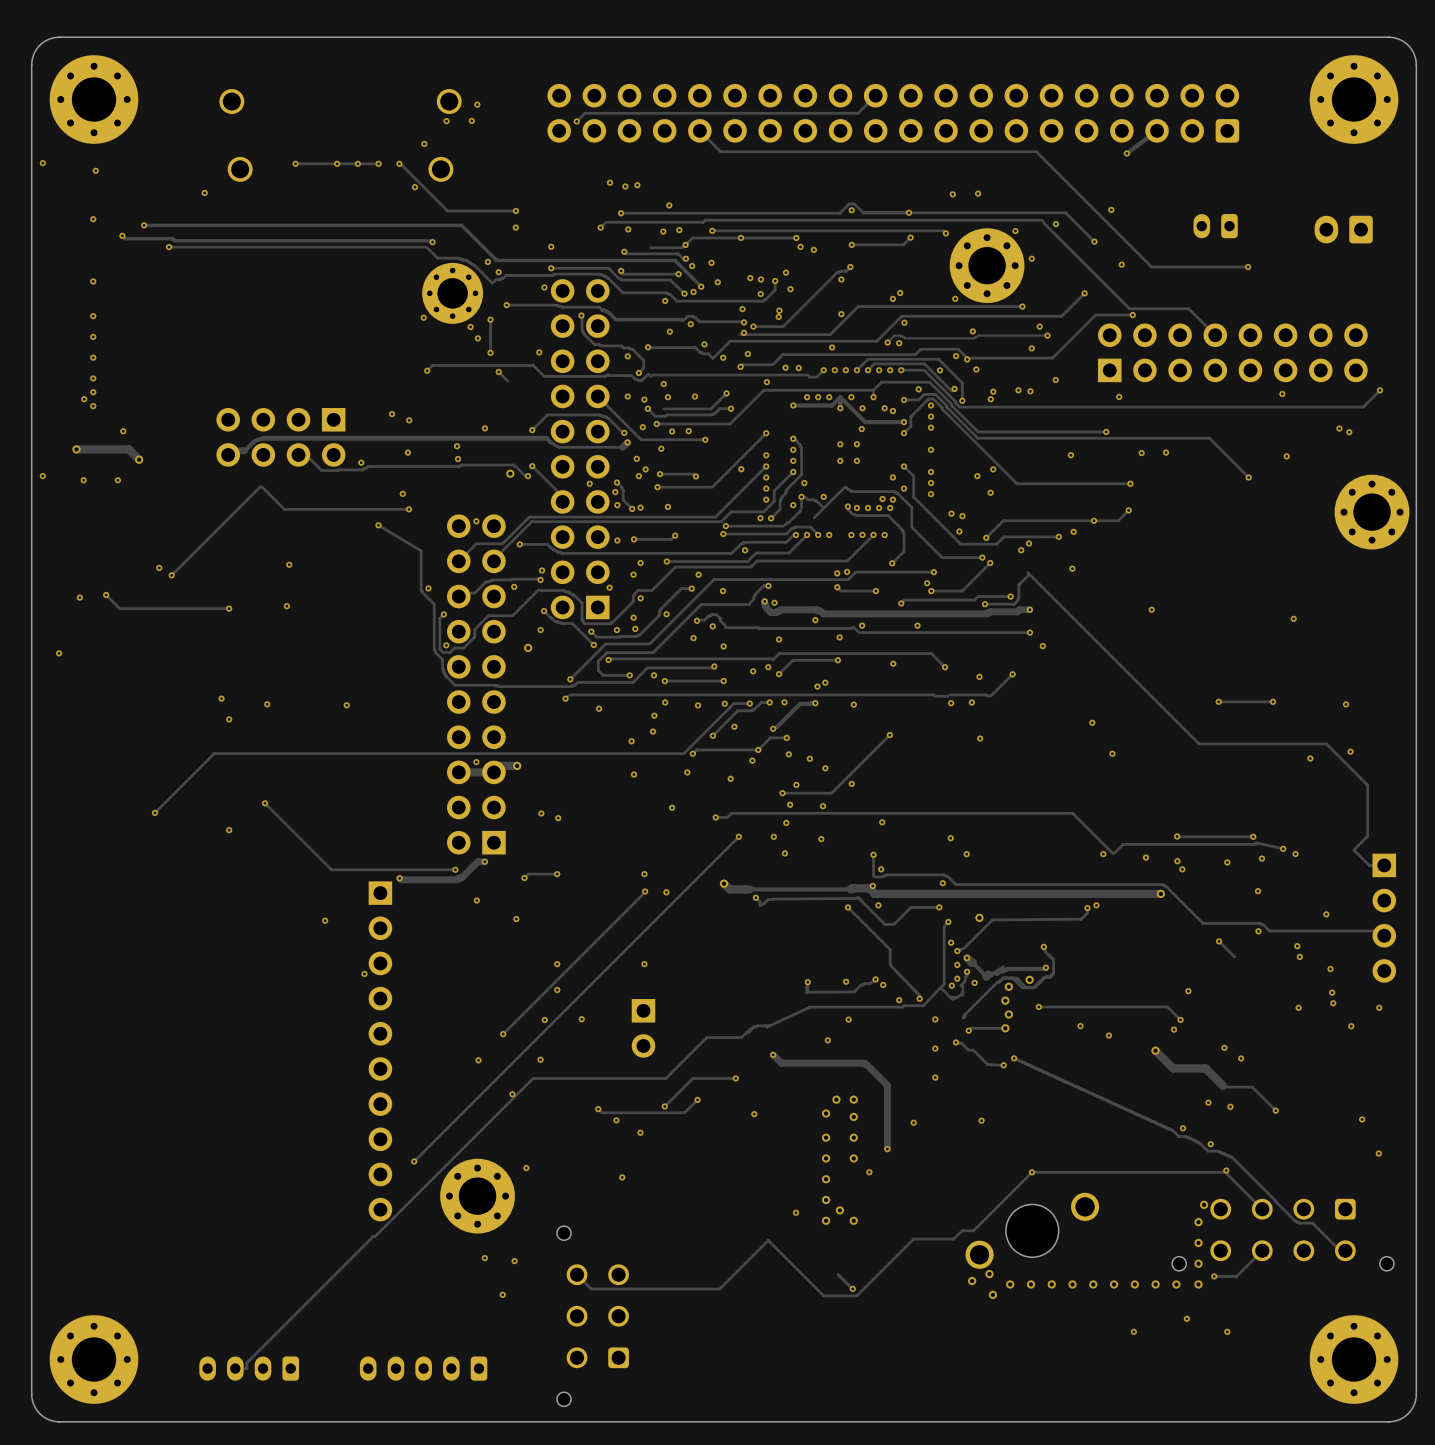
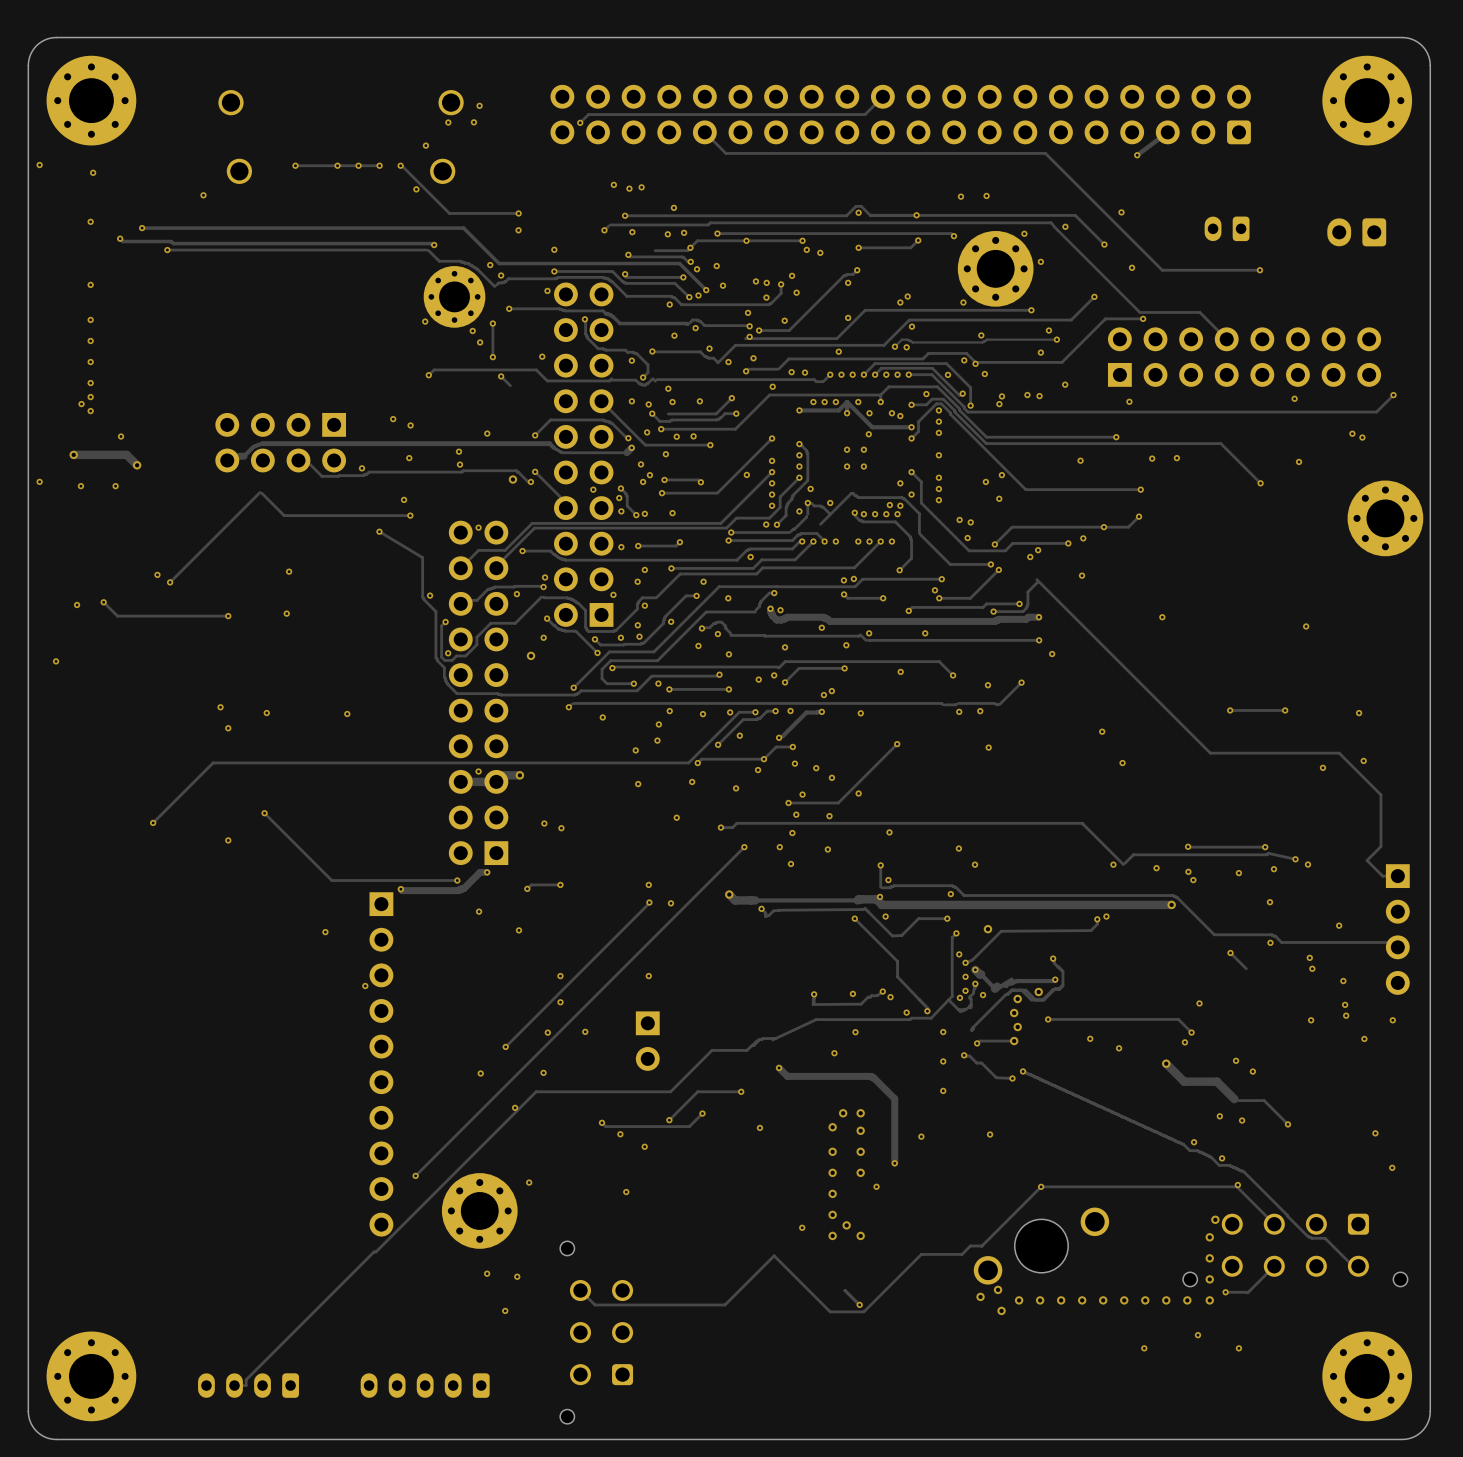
via: (779, 310) -> none

